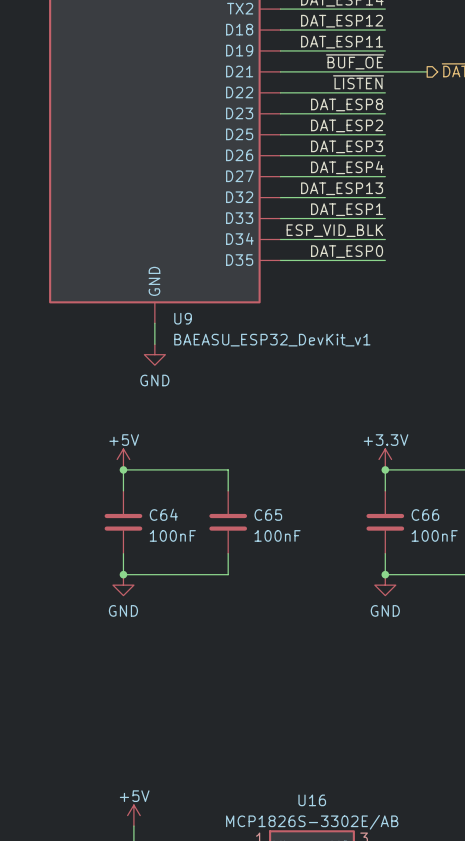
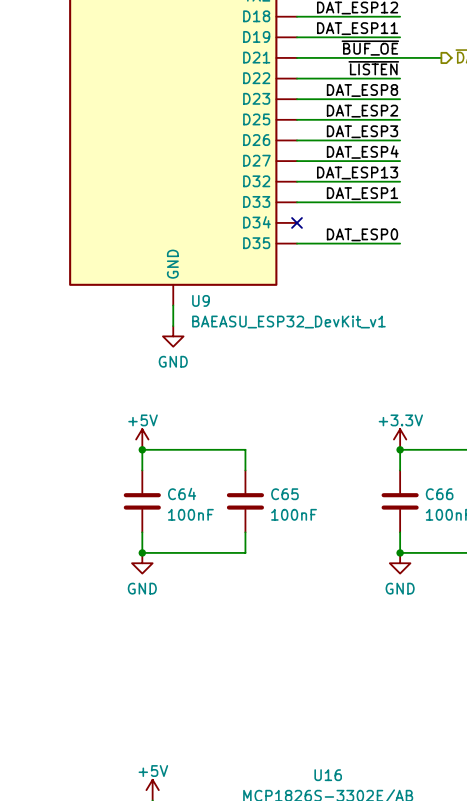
label: ESP_VID_BLK (334, 230) -> none
wire: (280, 239) (385, 239) -> none
no-connect mark: none -> (297, 222)

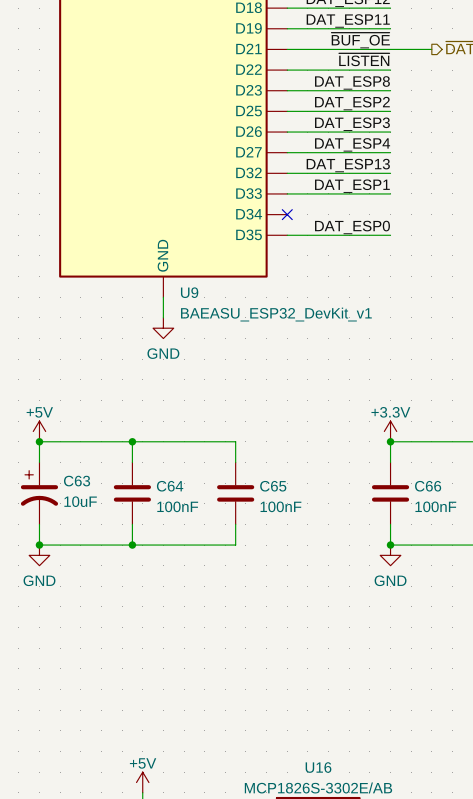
power symbol position: +5V (142, 439) -> +5V (39, 431)
junction: none -> (39, 441)
wire: none -> (132, 441) (39, 441) (39, 462)
C63: none -> 10uF (39, 493)
wire: none -> (39, 524) (39, 545) (132, 545)
junction: none -> (39, 545)
power symbol position: GND (142, 563) -> GND (39, 555)

